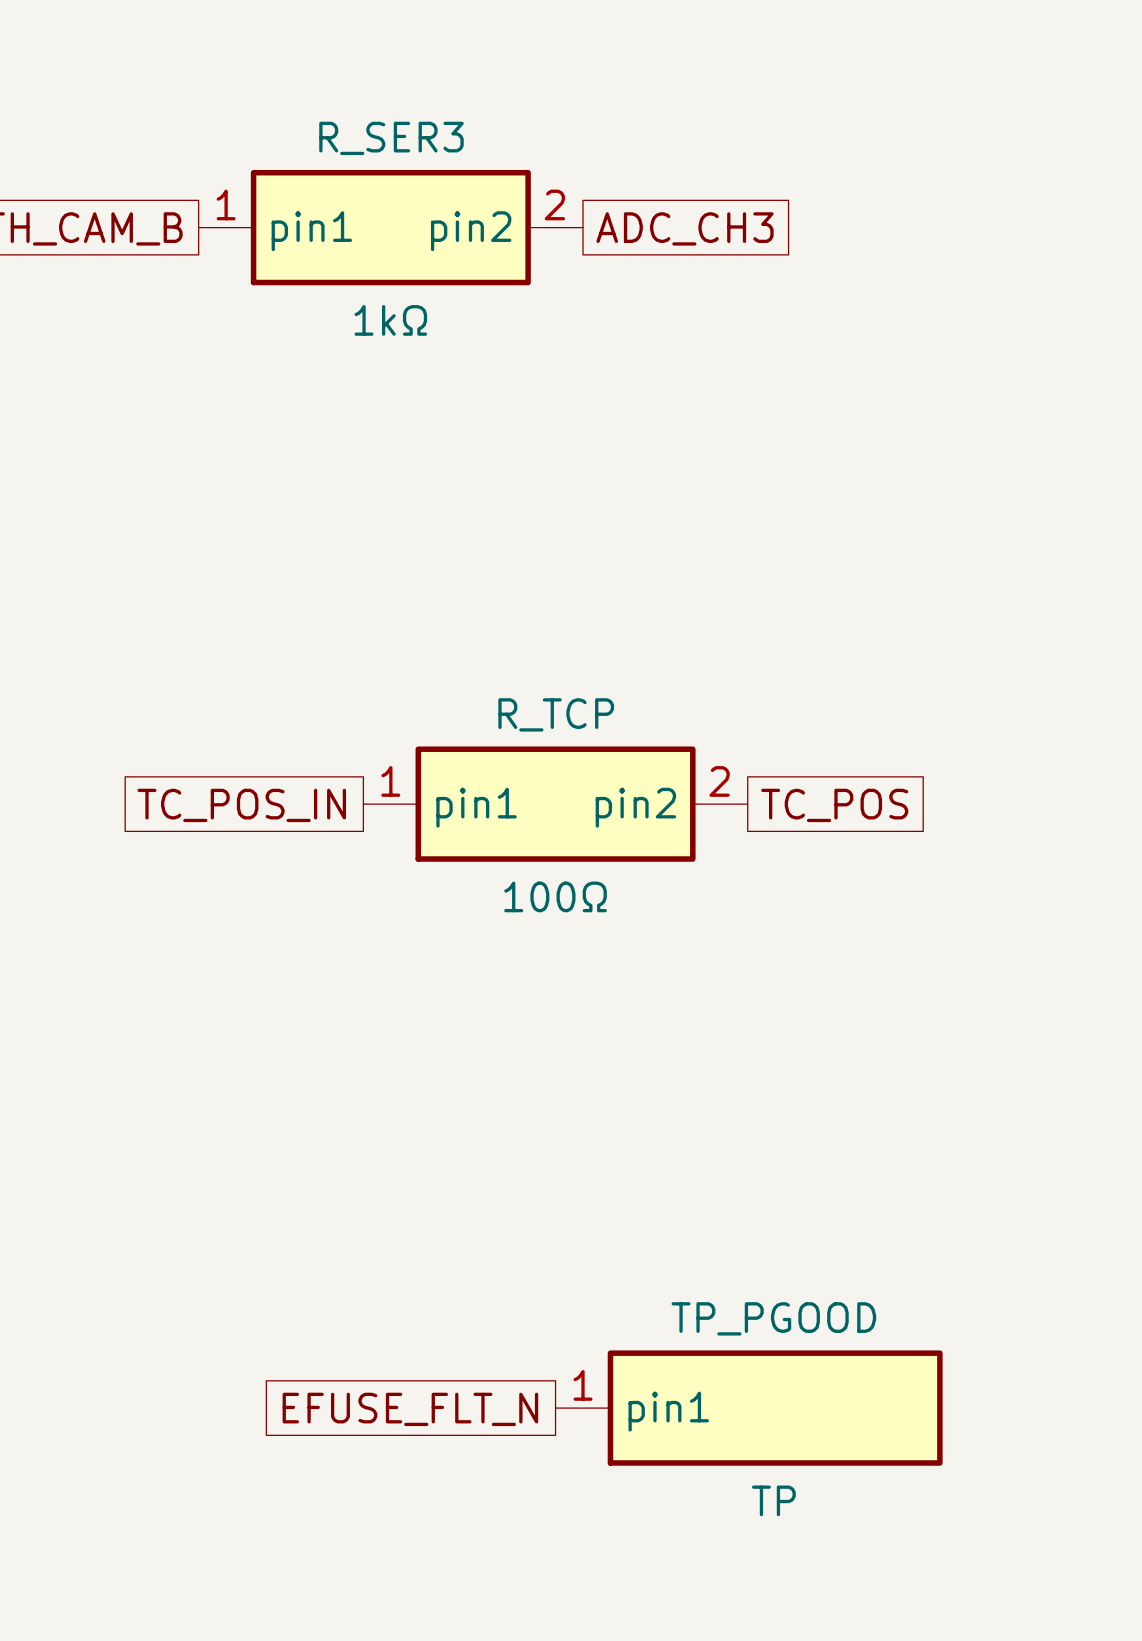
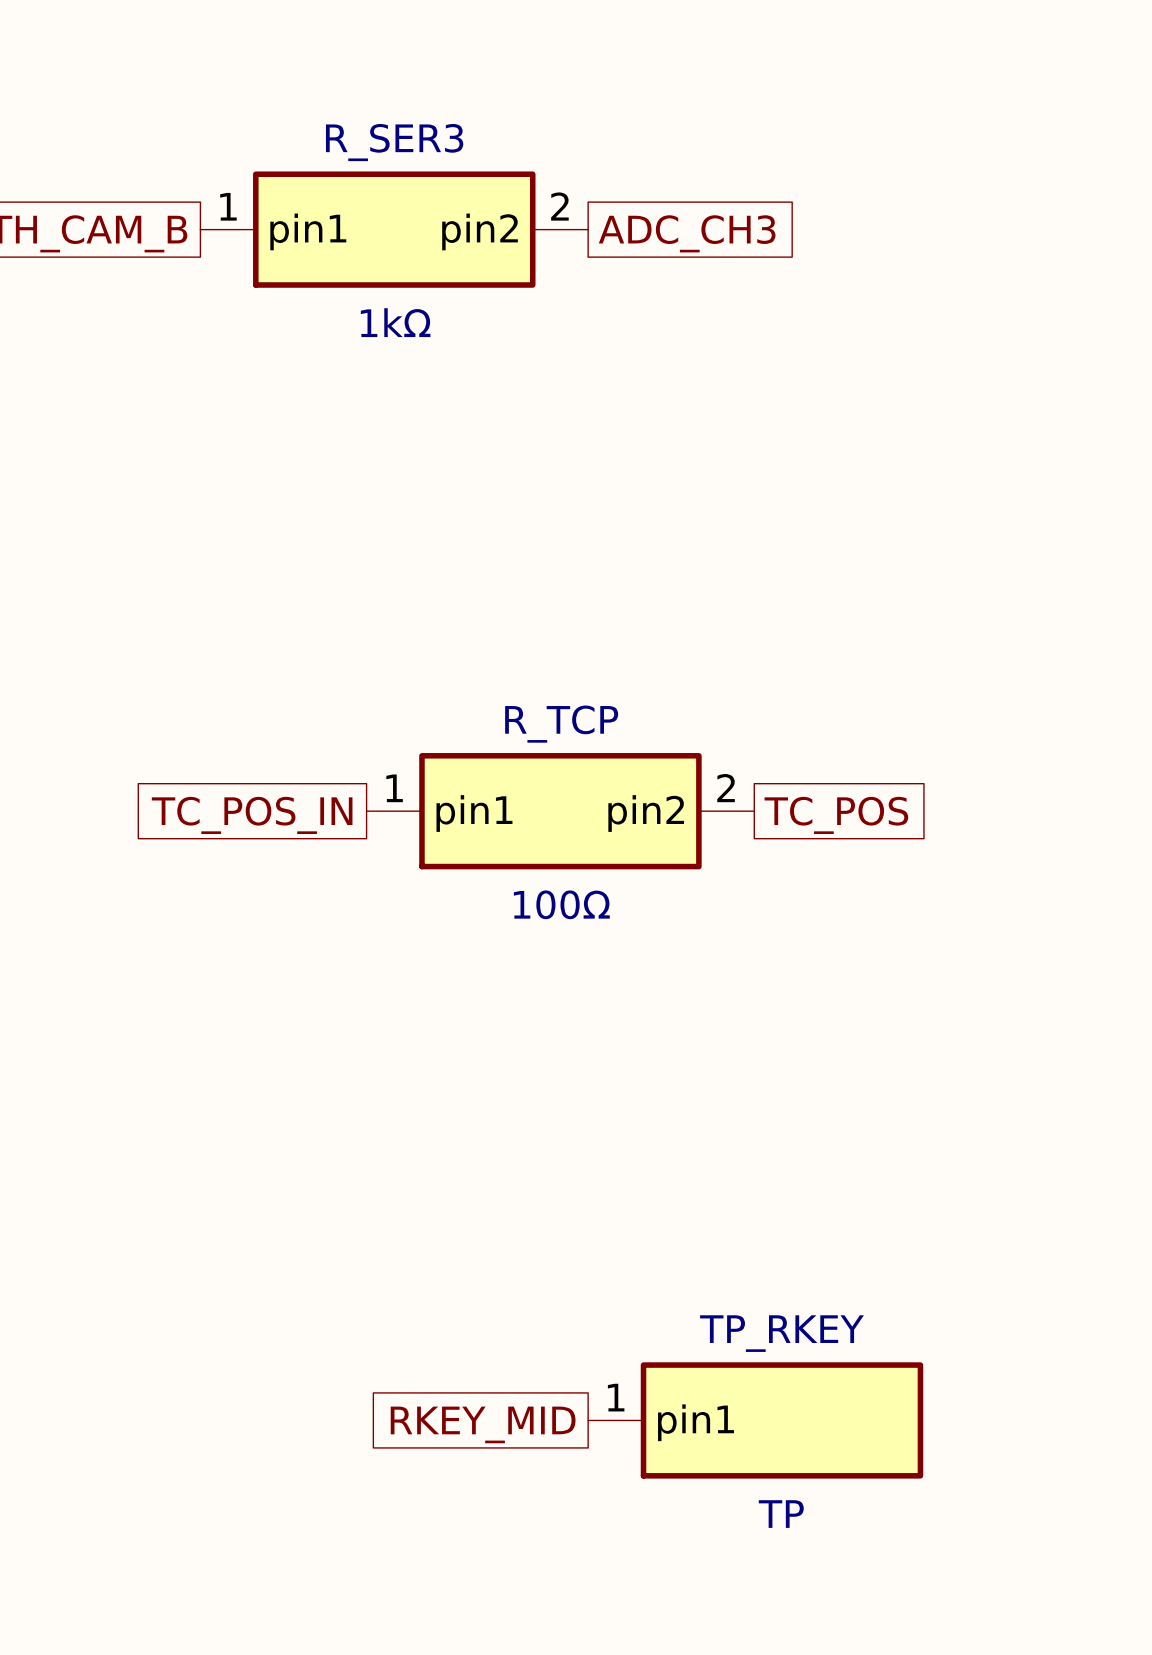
TP_PGOOD: TP (749, 1408) -> none
TP_RKEY: none -> TP (755, 1420)
global label: EFUSE_FLT_N (410, 1409) -> none
global label: none -> RKEY_MID (483, 1424)

